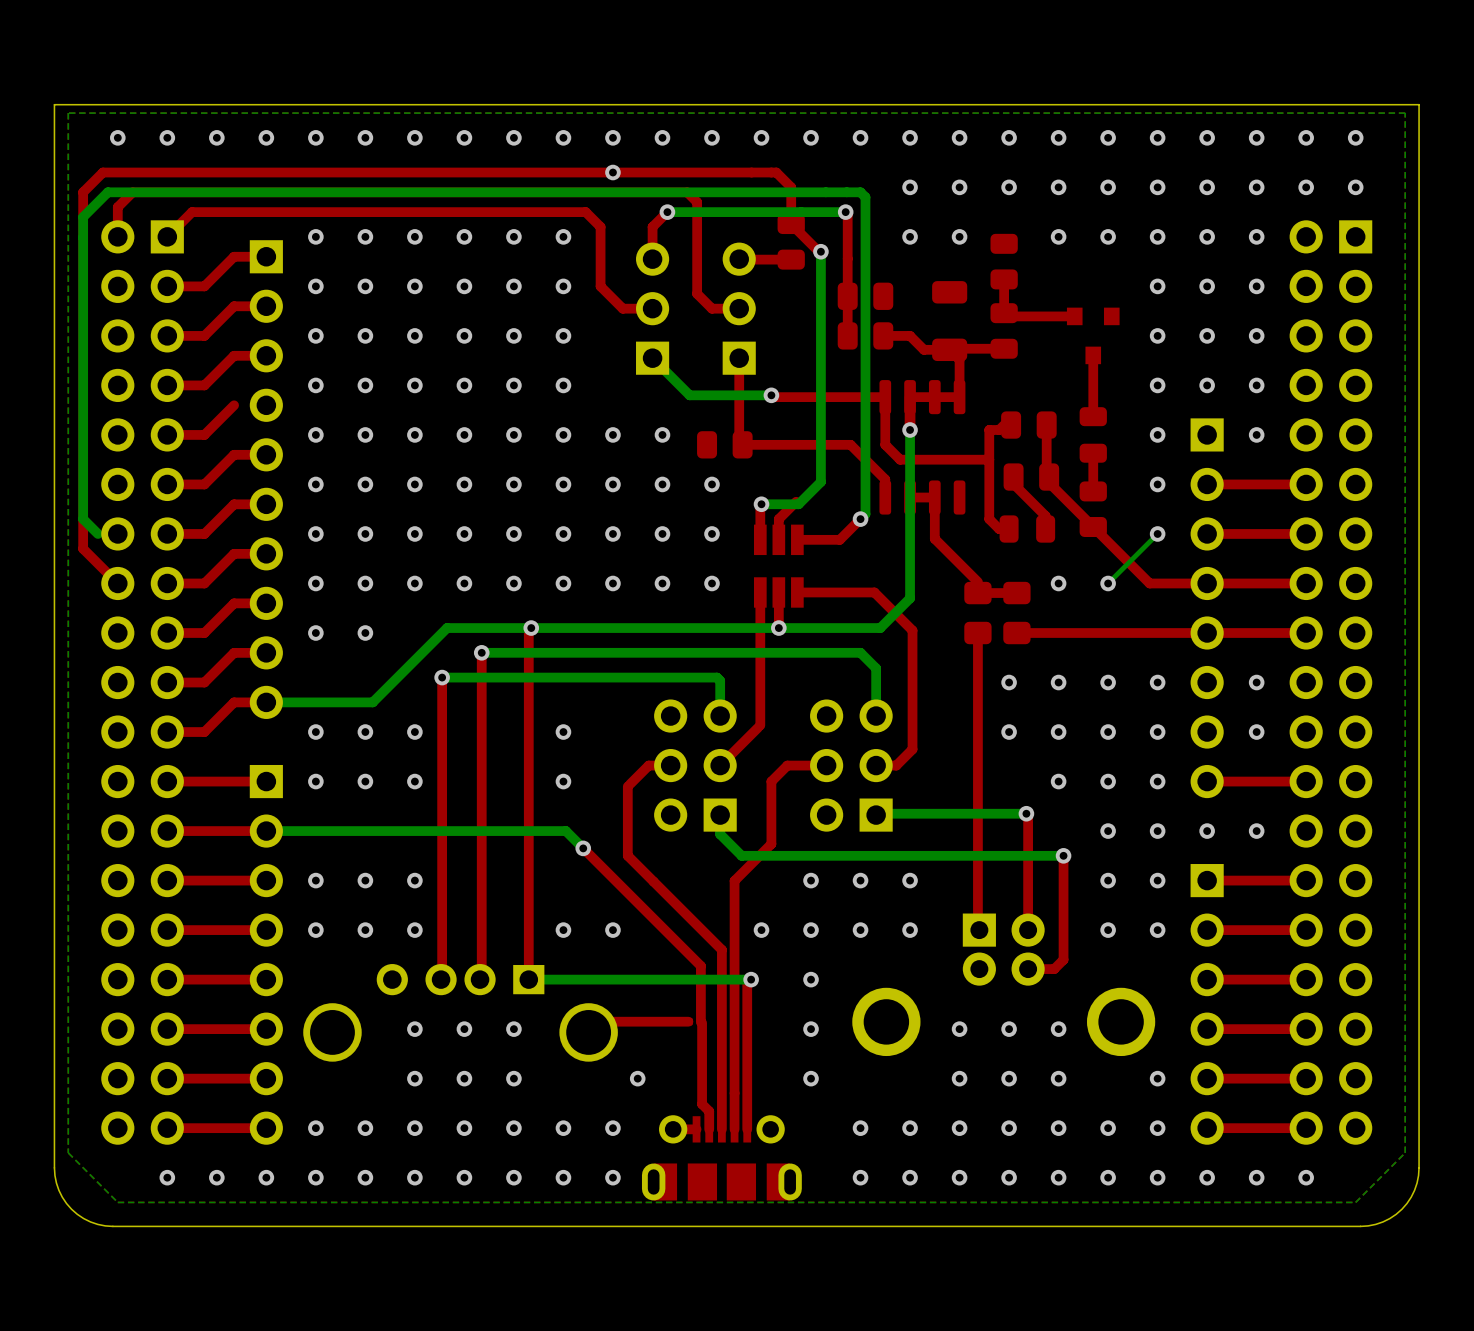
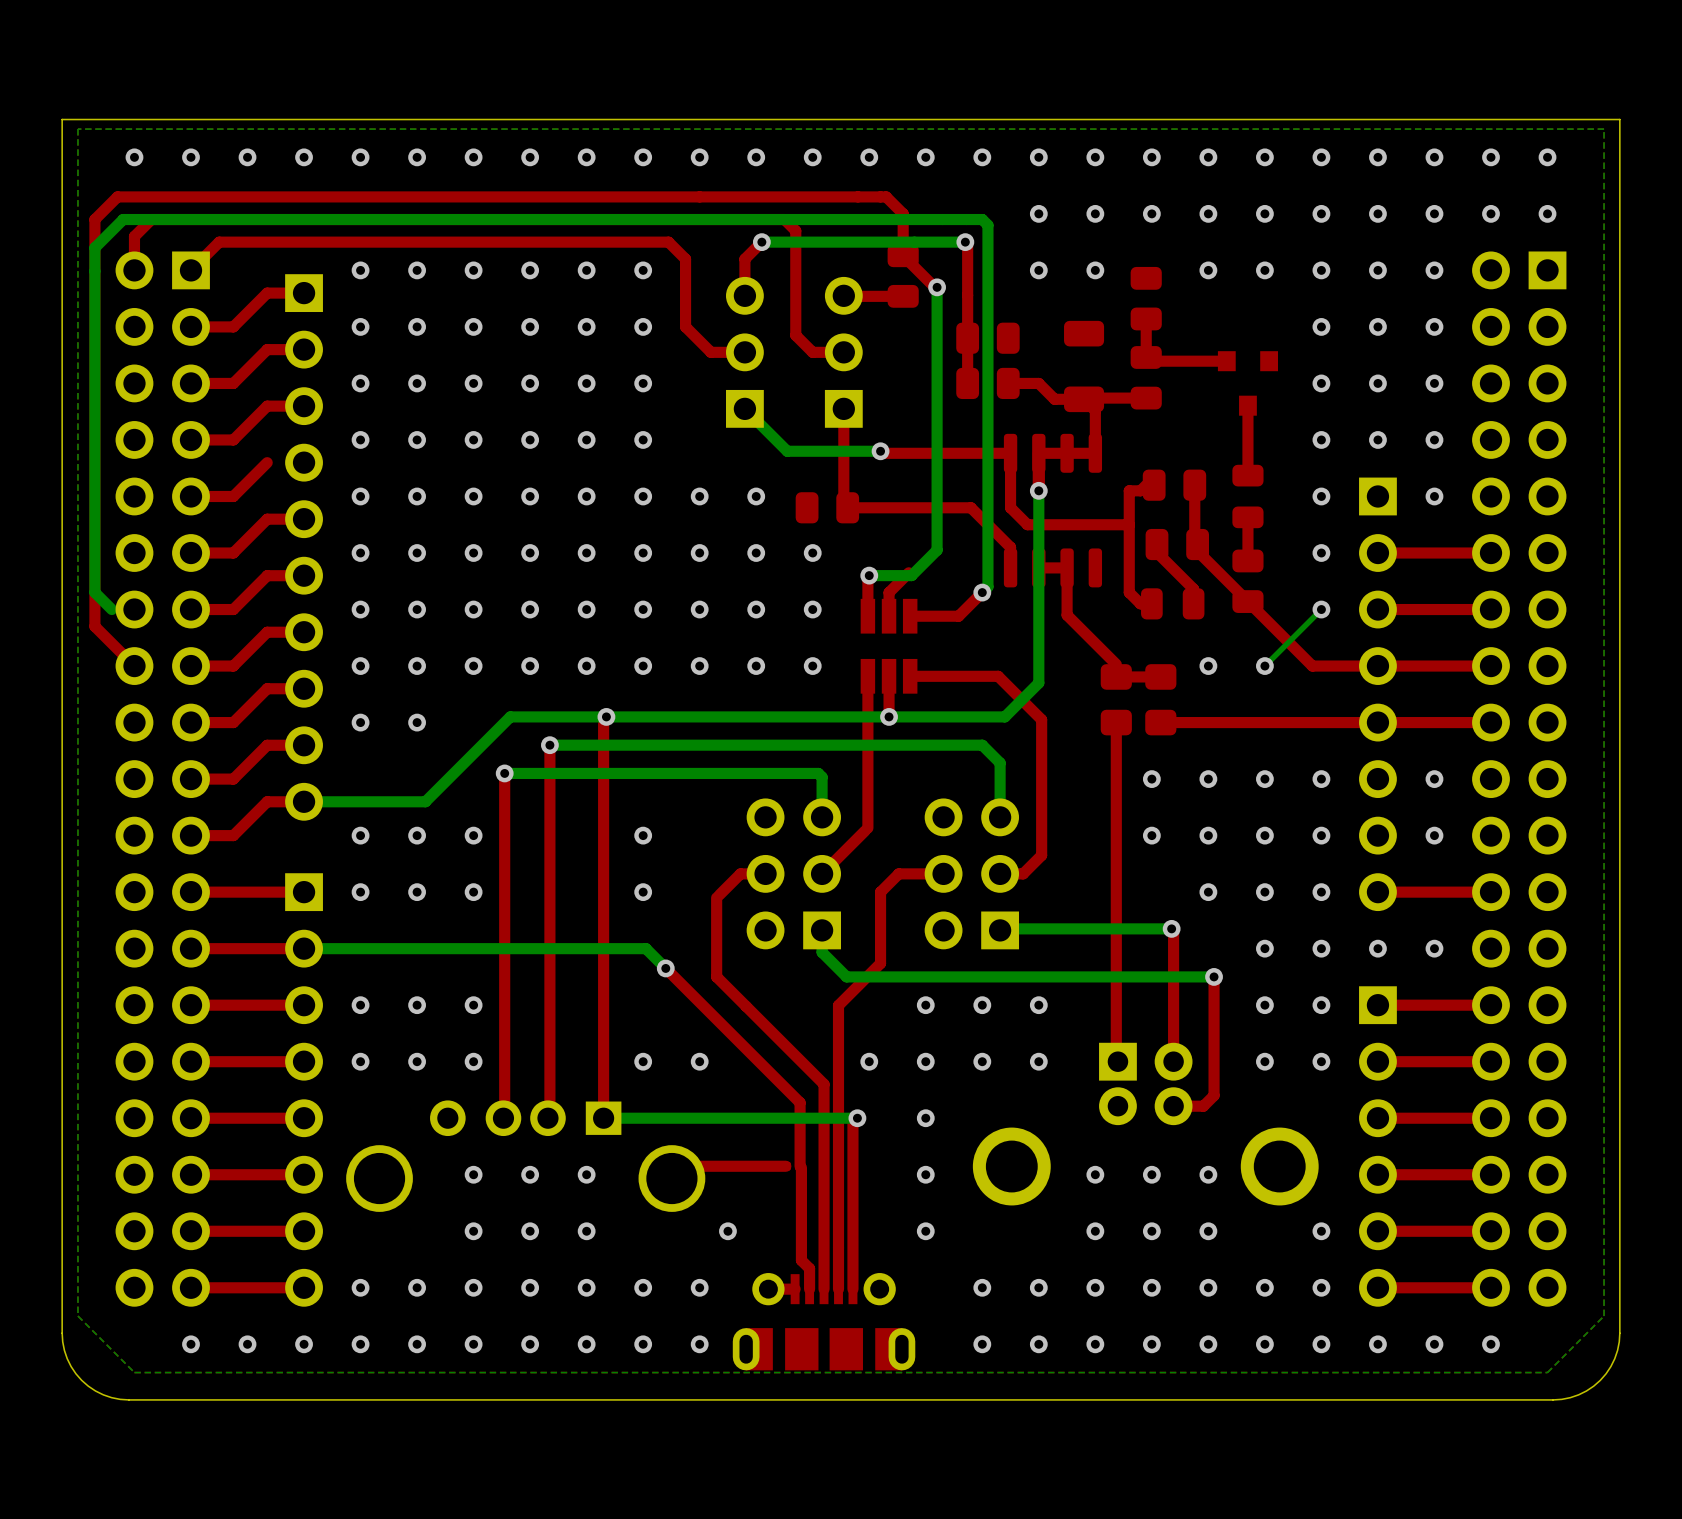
via: (612, 172) -> none

